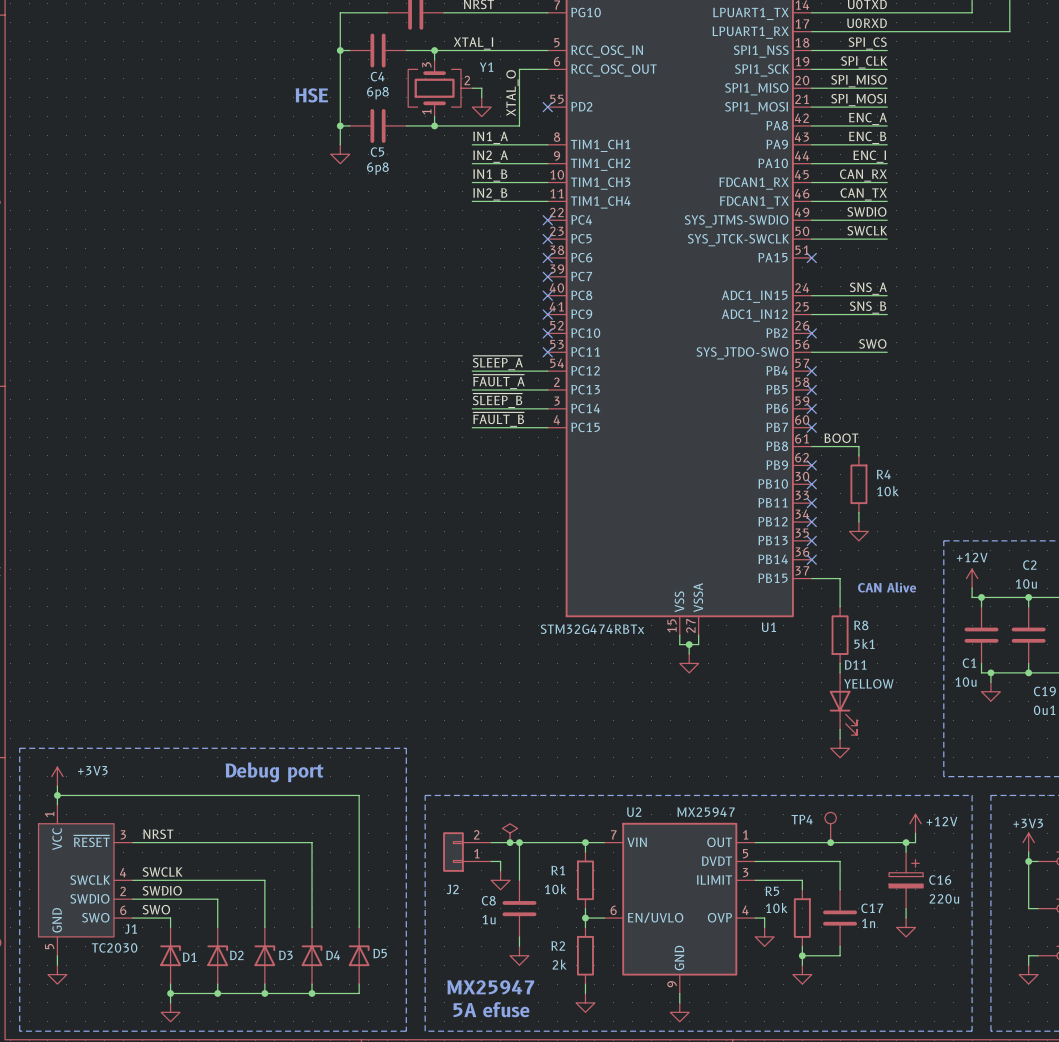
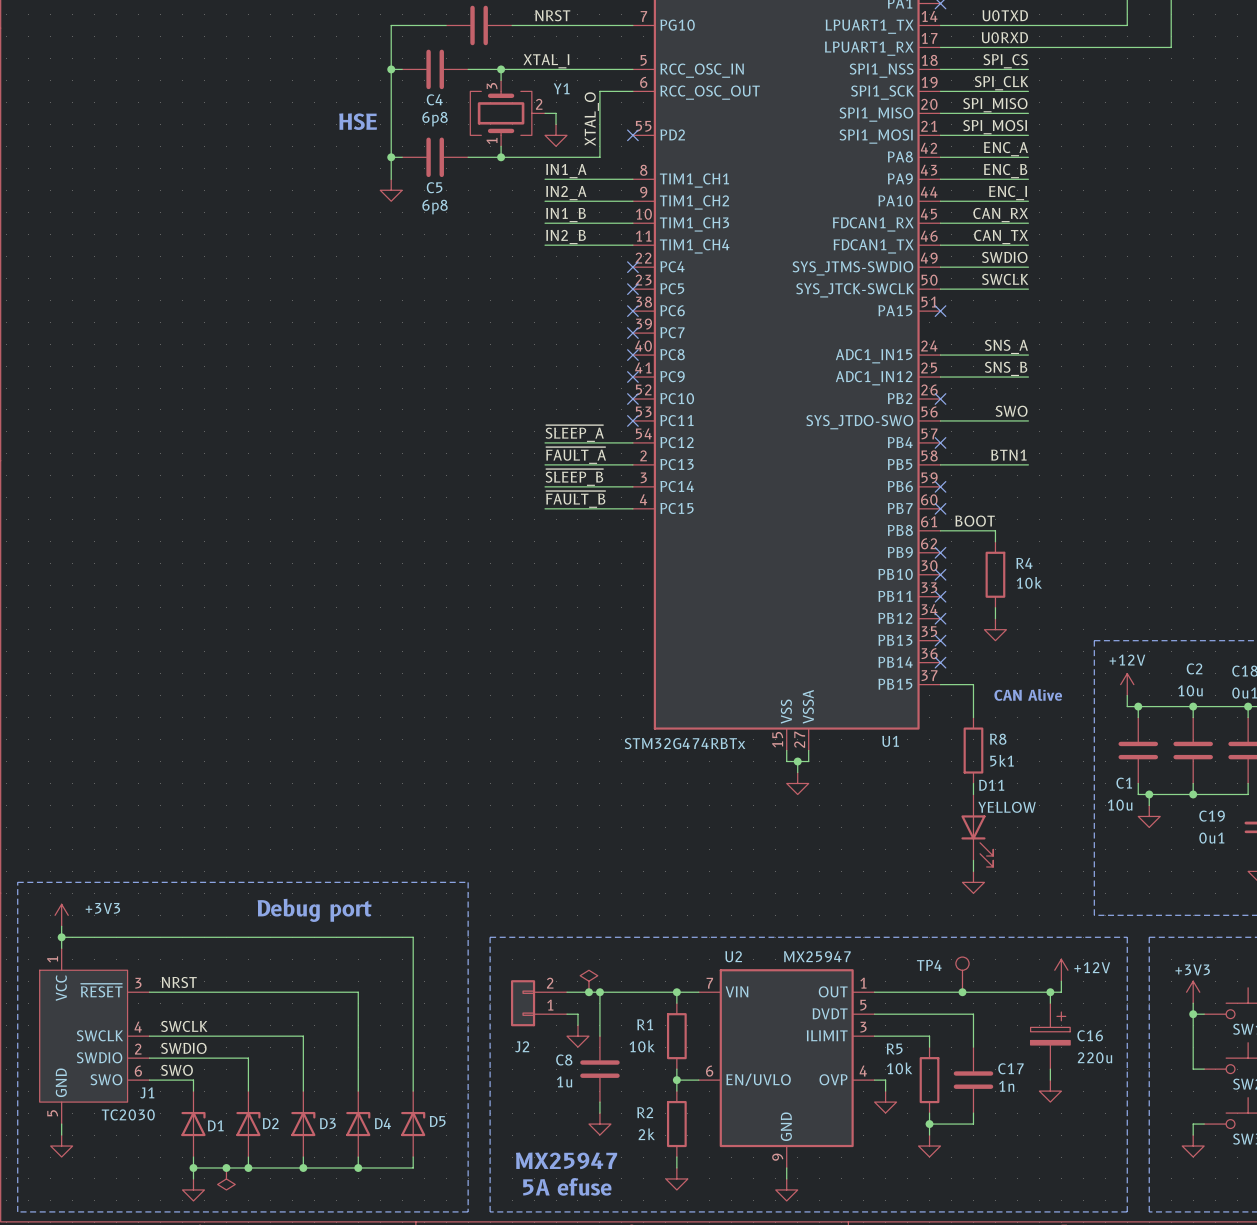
label: none -> BTN1 (1008, 455)
wire: none -> (940, 464) (1028, 464)
no-connect mark: (811, 389) -> none
junction: none -> (226, 1167)
power symbol: none -> (226, 1178)

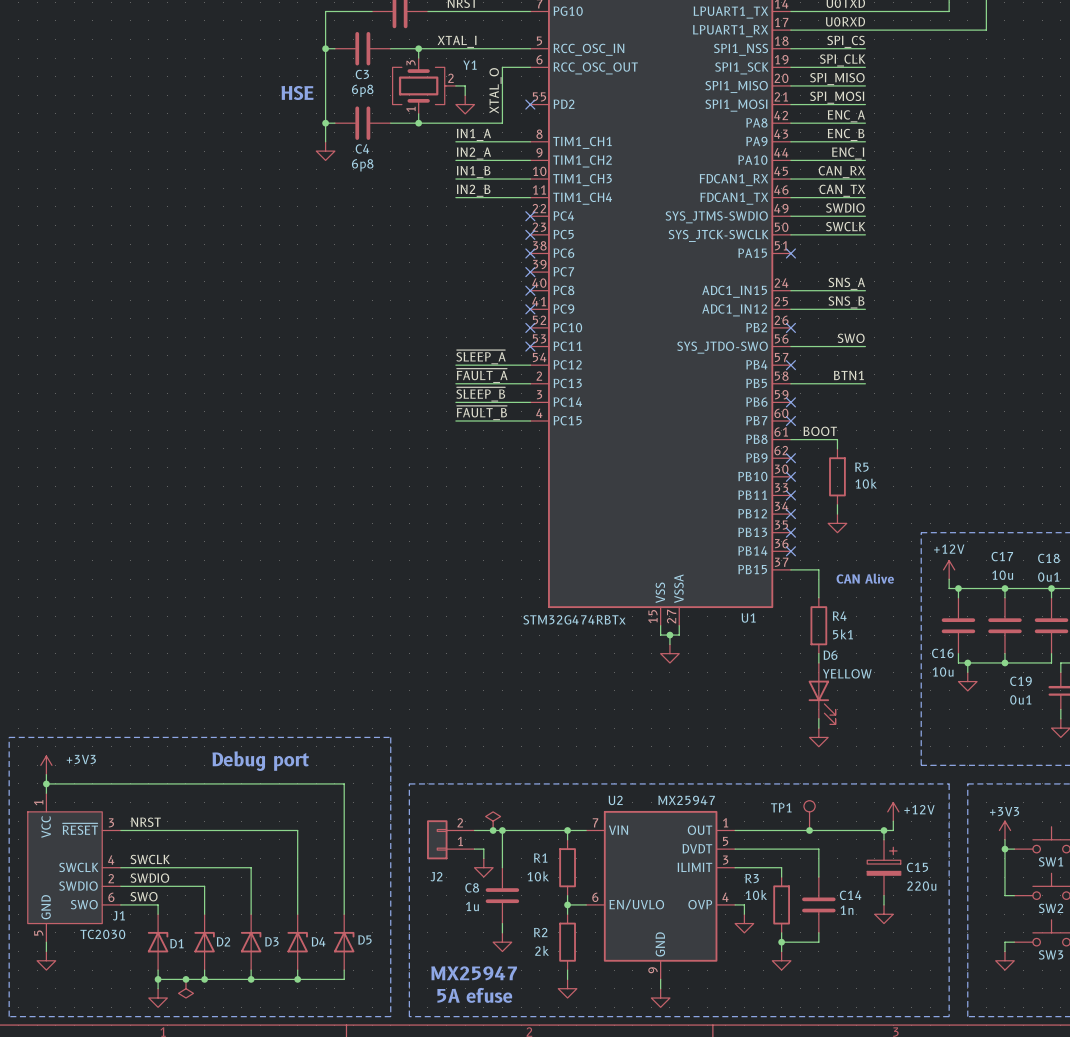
C4 name: C4 (434, 99) -> C3 (362, 74)
C5 name: C5 (434, 187) -> C4 (362, 148)
R4 name: R4 (1024, 563) -> R5 (861, 467)
C2 name: C2 (1194, 668) -> C17 (1002, 556)
R8 name: R8 (998, 739) -> R4 (839, 616)
C1 name: C1 (1124, 783) -> C16 (942, 653)
D11 name: D11 (991, 785) -> D6 (830, 655)
TP4 name: TP4 (929, 965) -> TP1 (781, 807)
C16 name: C16 (1090, 1035) -> C15 (917, 867)
R5 name: R5 (894, 1048) -> R3 (752, 878)
C17 name: C17 (1010, 1068) -> C14 (850, 895)

